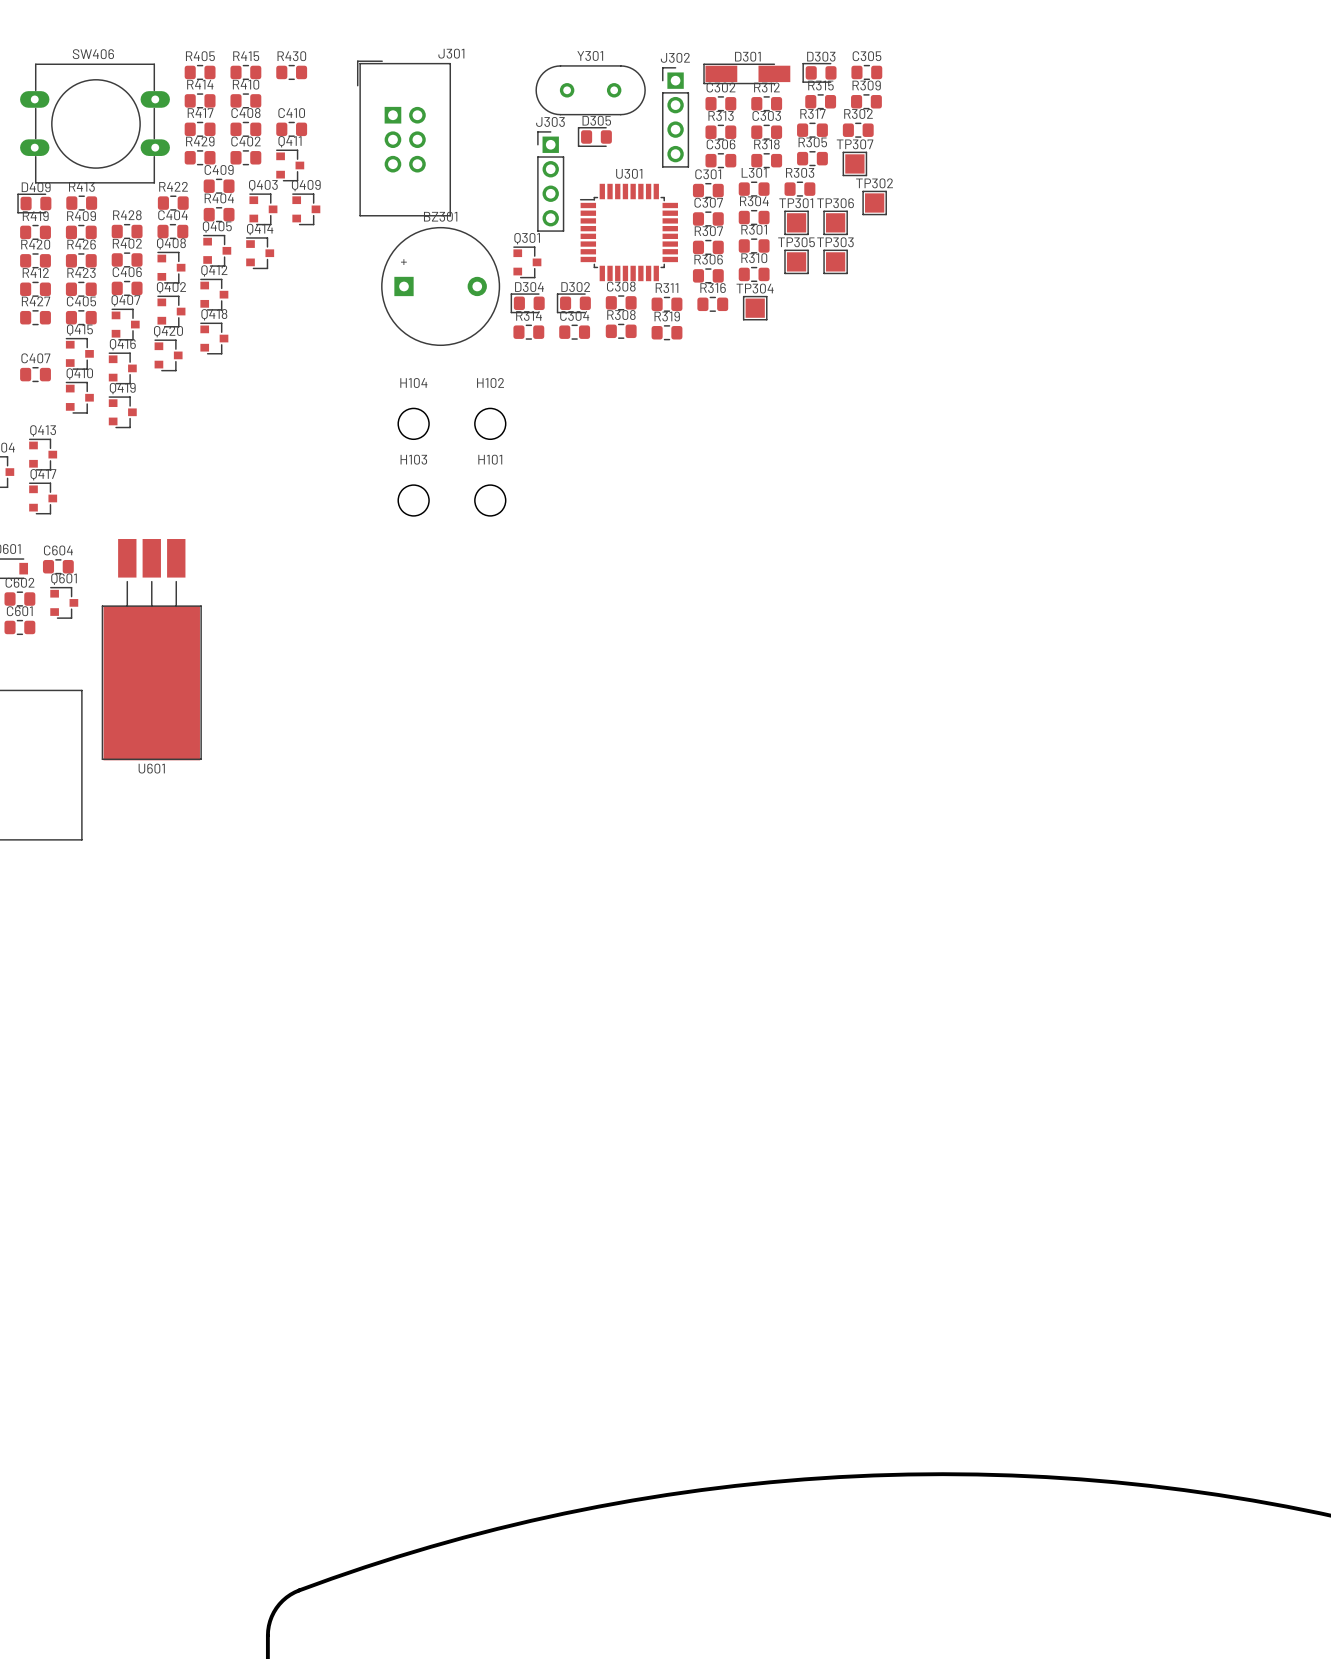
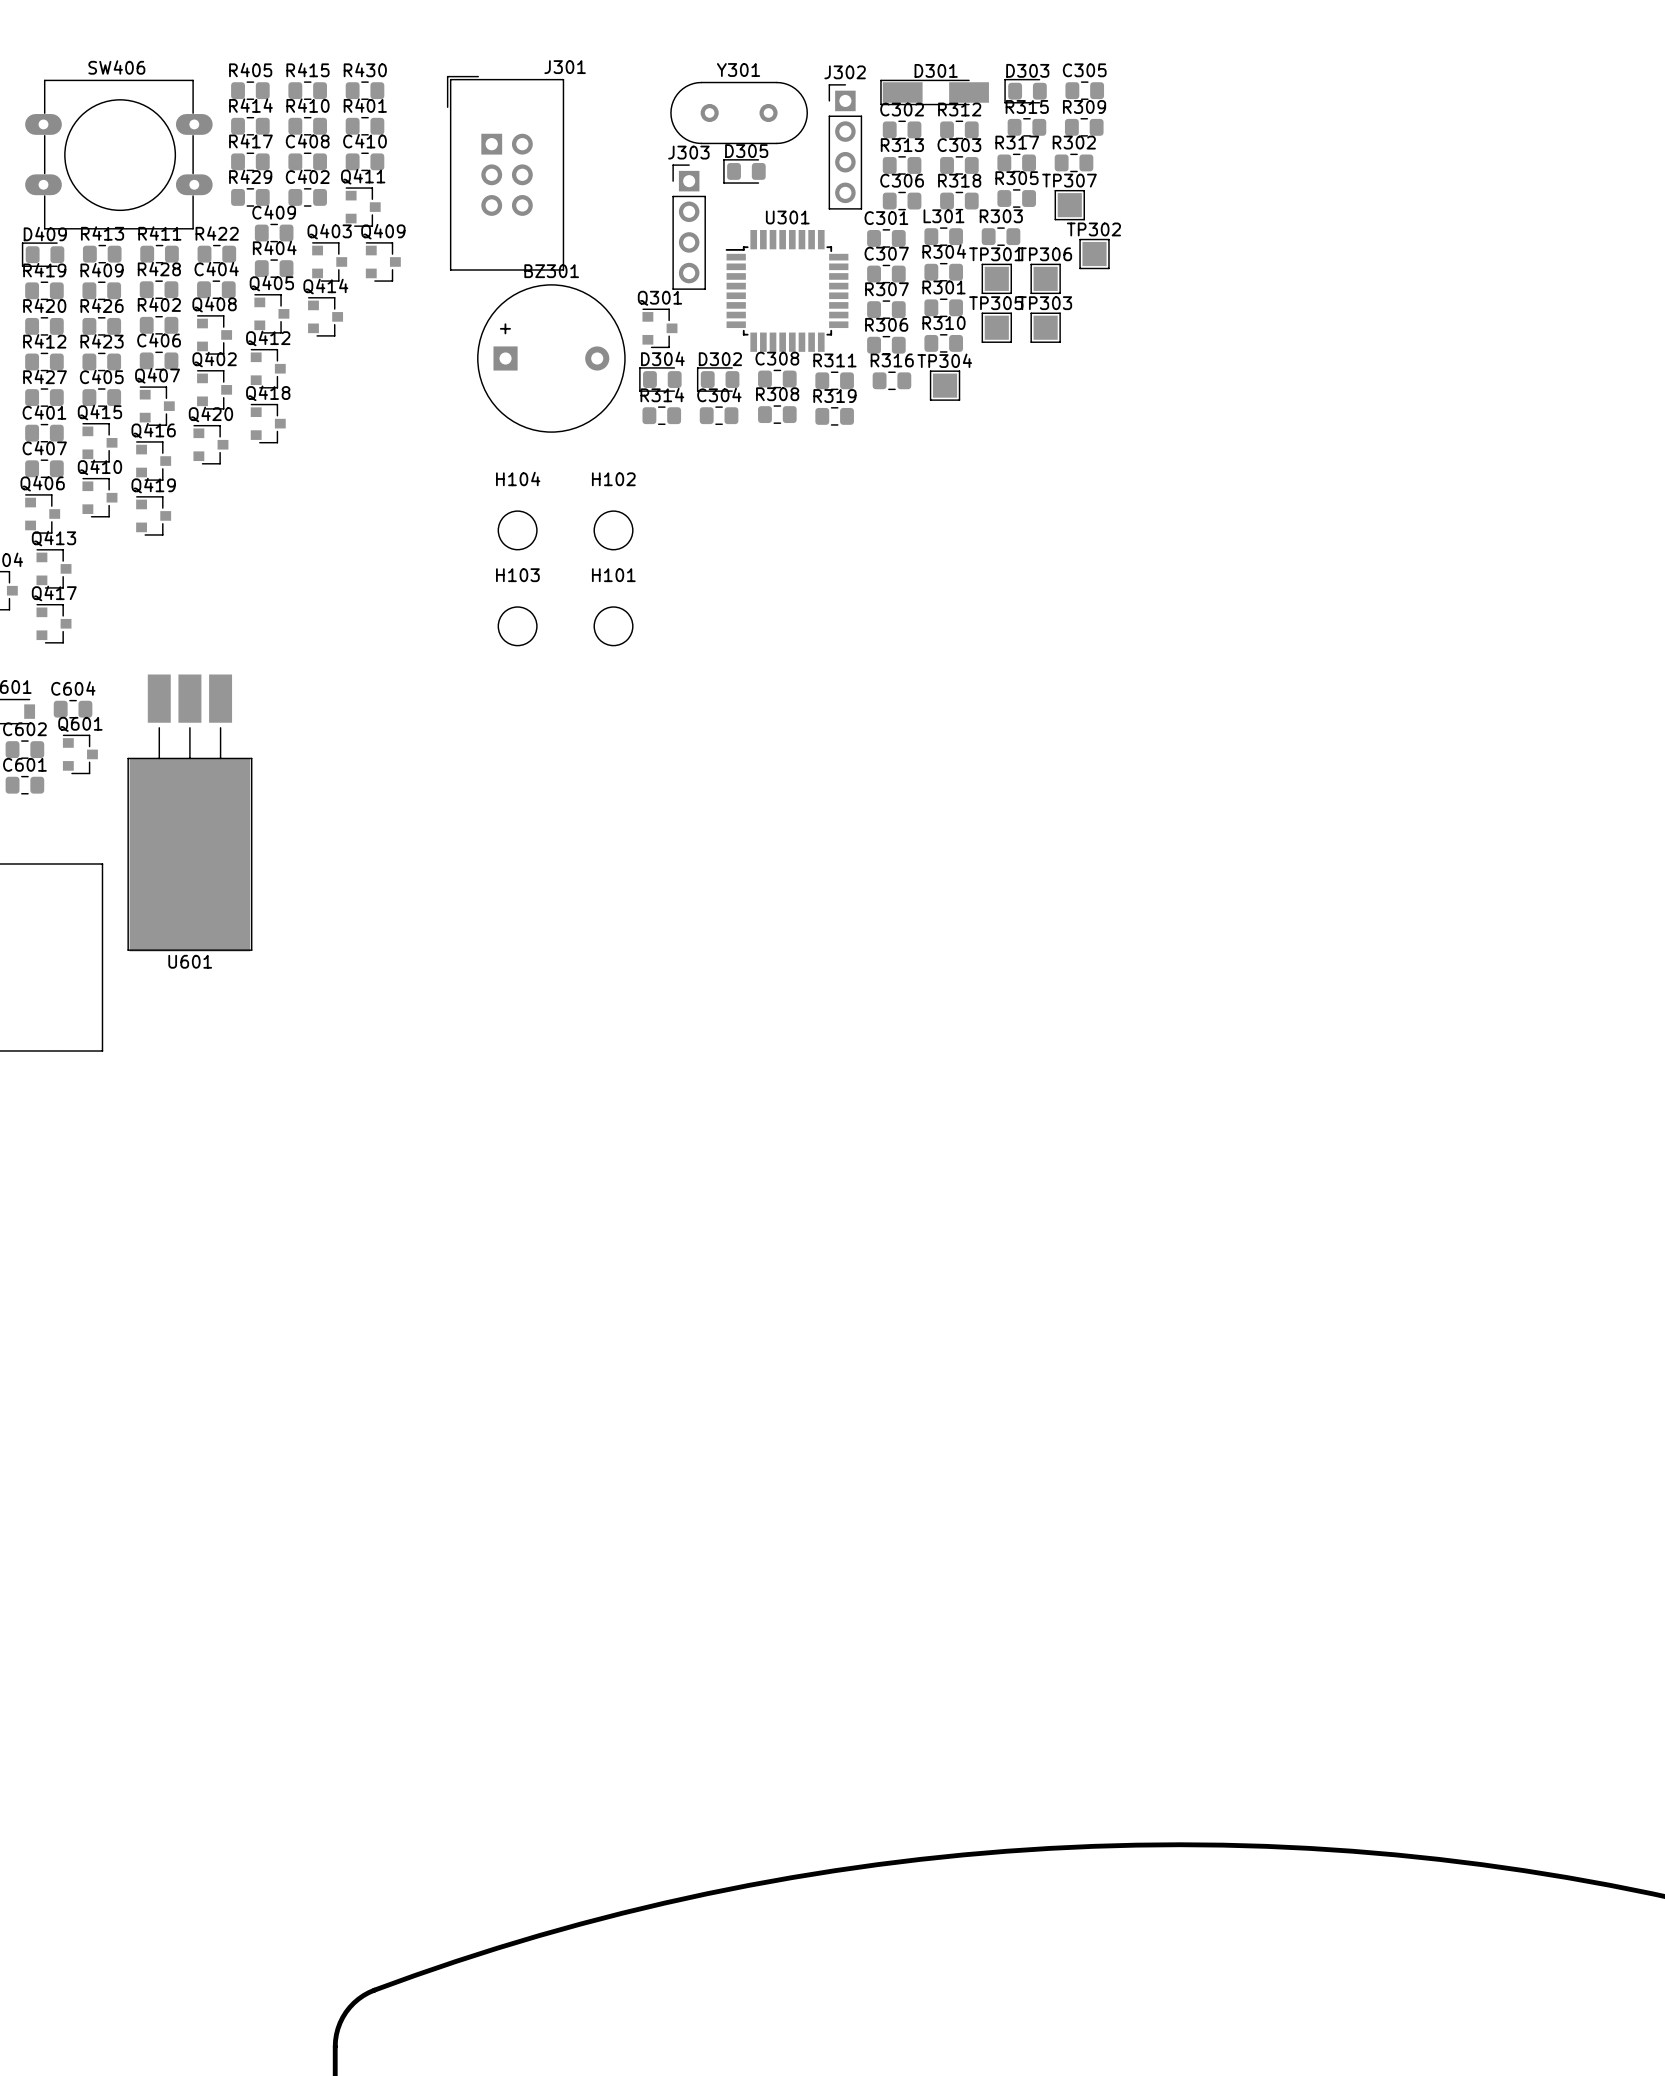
R401: none -> (365, 126)
R411: none -> (159, 254)
C401: none -> (44, 433)
Q406: none -> (42, 513)

